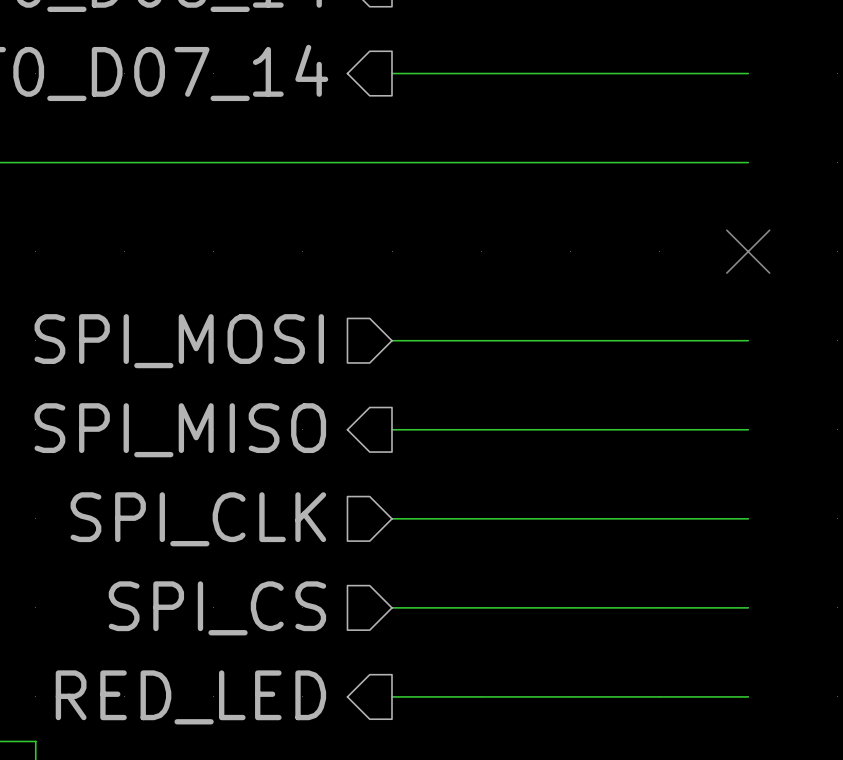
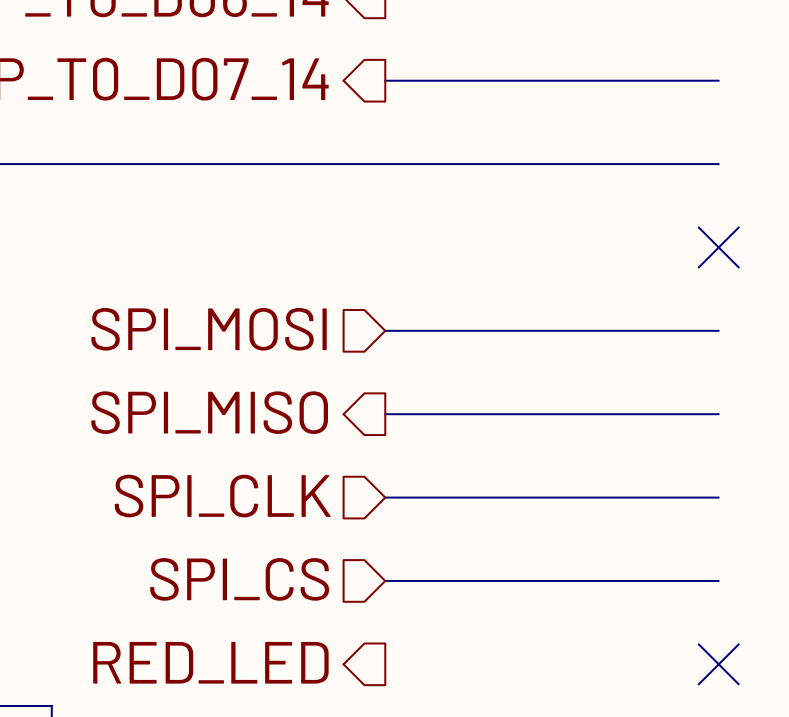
wire: (392, 696) (748, 696) -> none
no-connect mark: none -> (718, 664)

